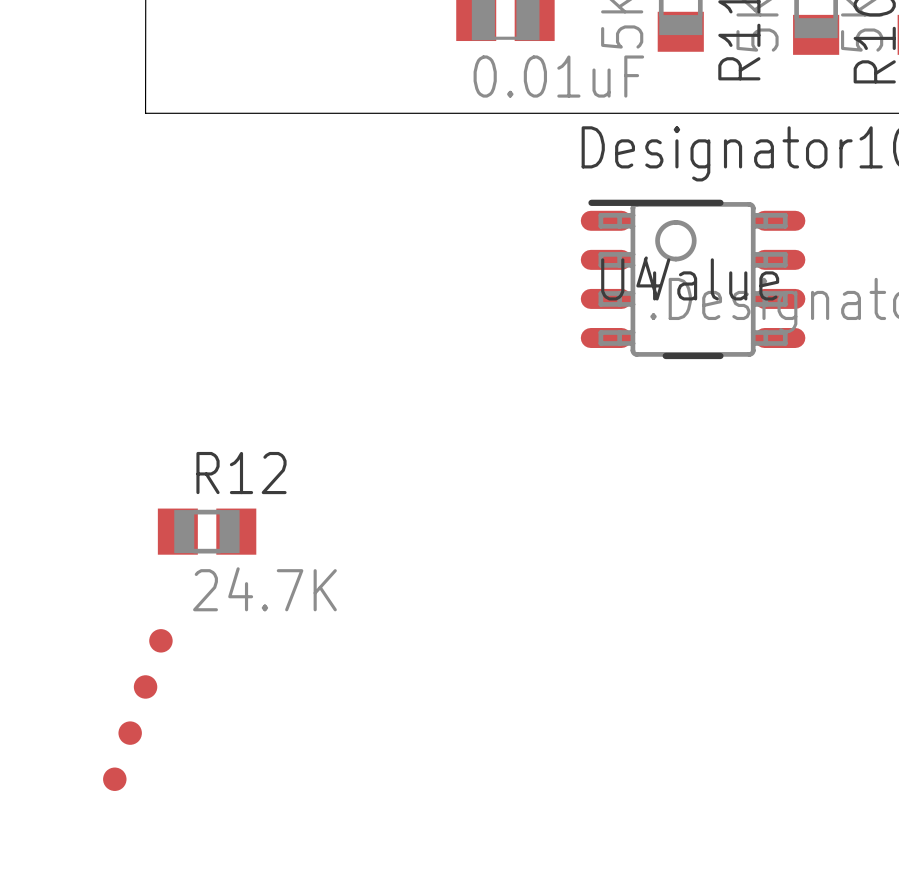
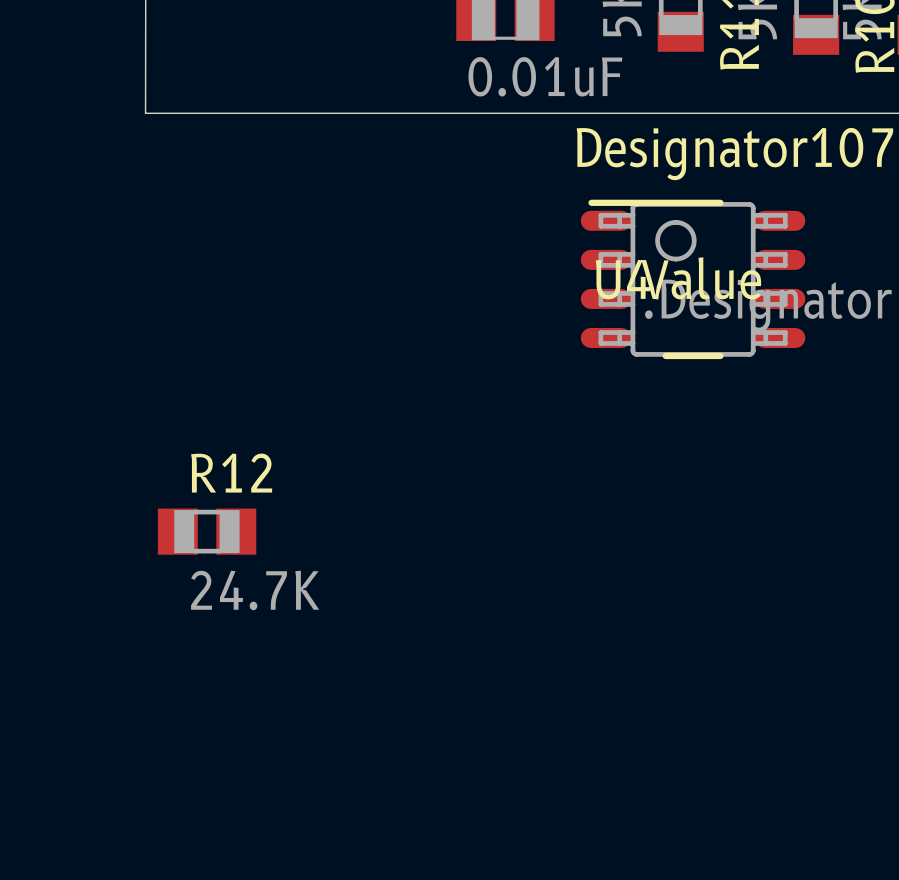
part: (160, 640) -> none
part: (145, 686) -> none
part: (130, 733) -> none
part: (114, 779) -> none

